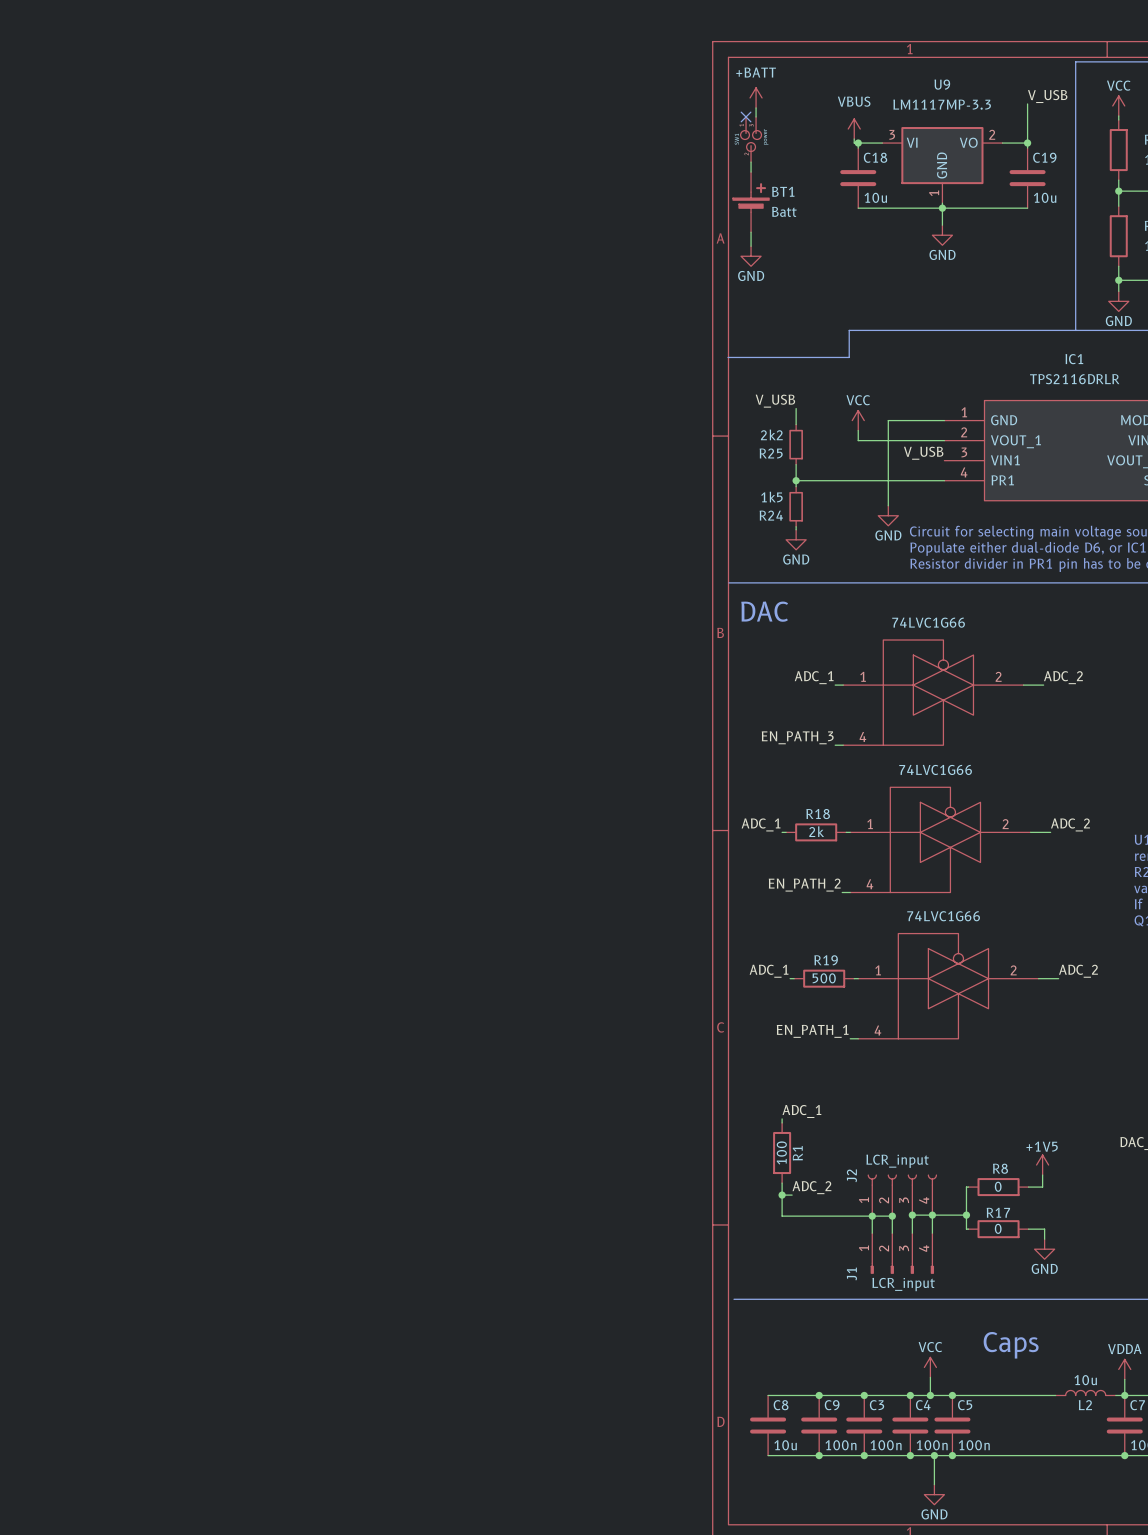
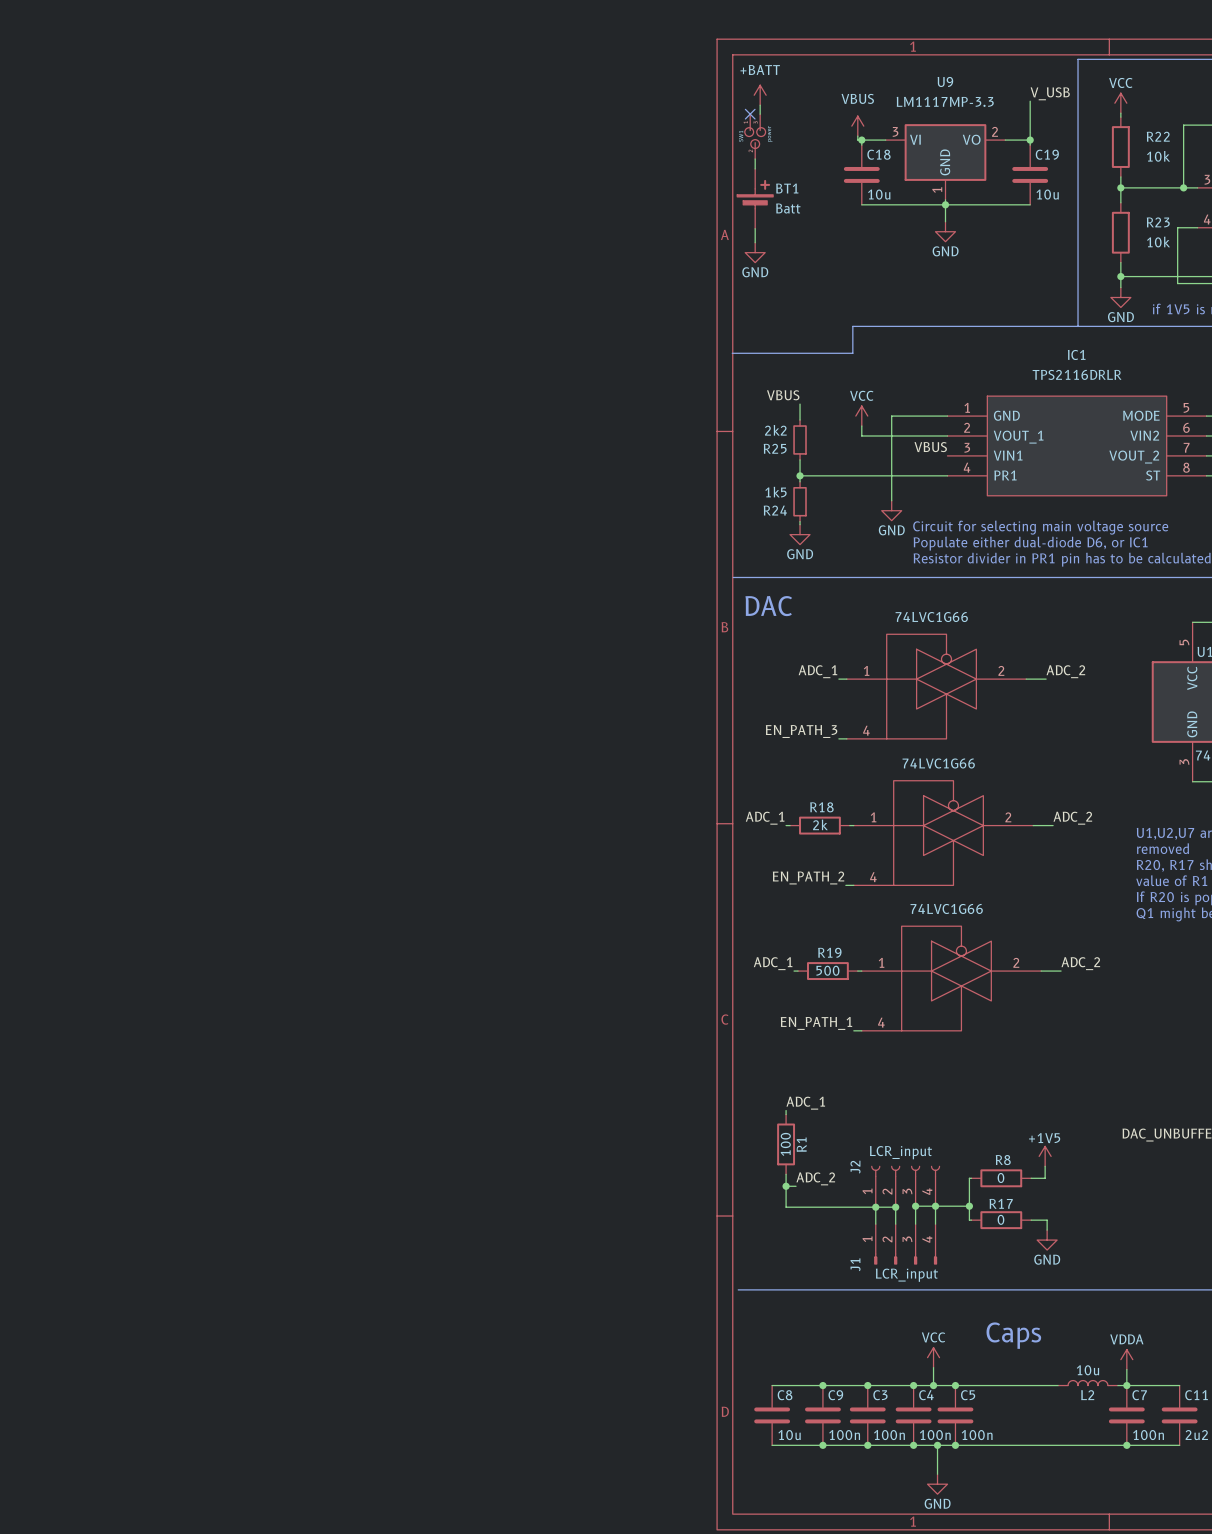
label: V_USB (775, 401) -> VBUS (783, 395)
label: V_USB (923, 453) -> VBUS (930, 447)

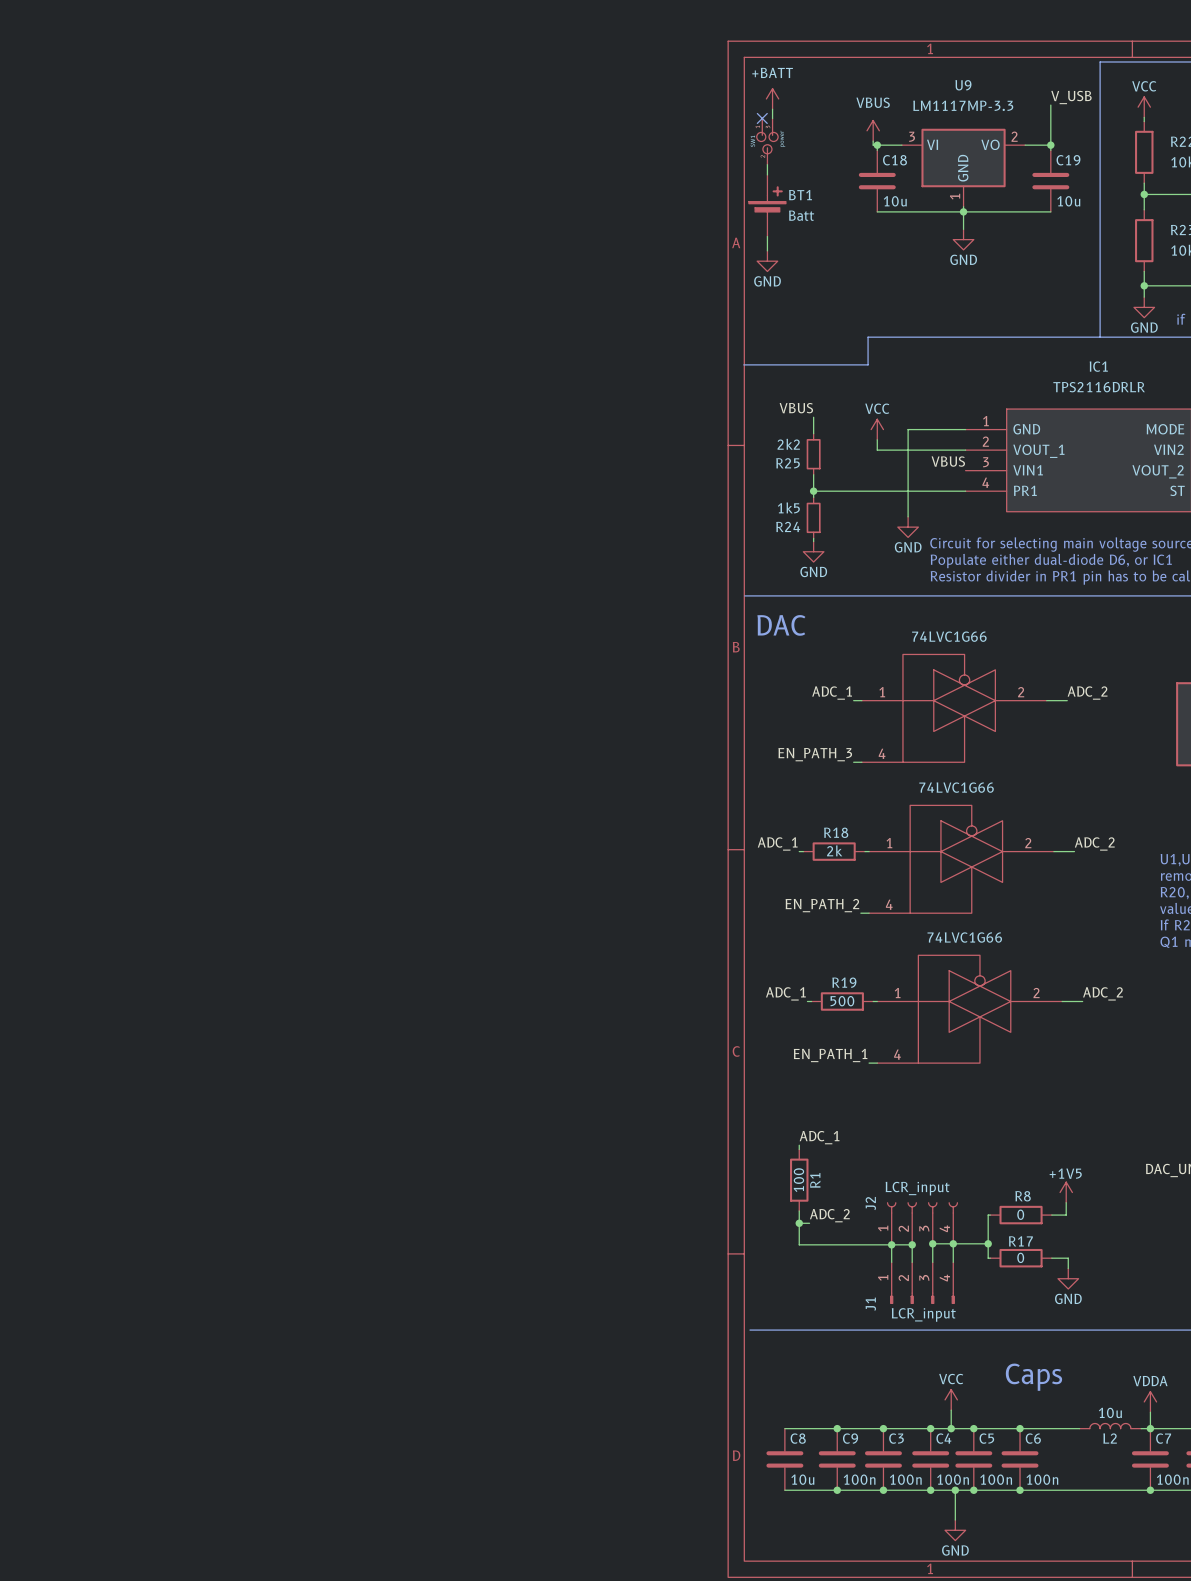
junction: none -> (1020, 1428)
C6: none -> 100n (1020, 1459)
junction: none -> (1020, 1490)

